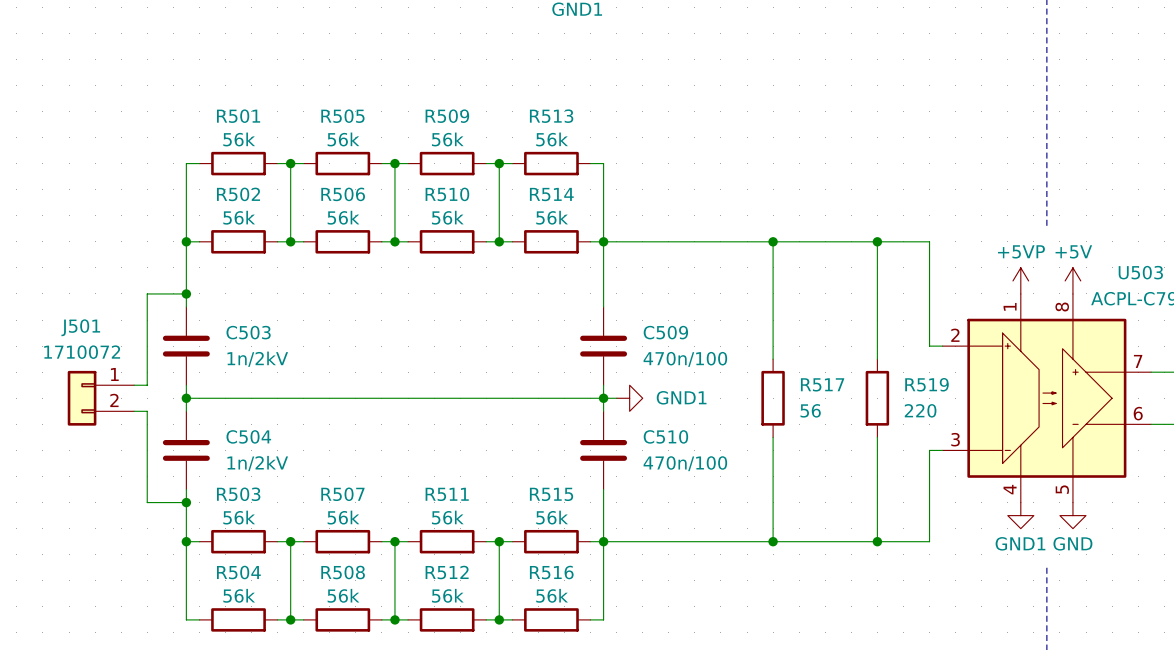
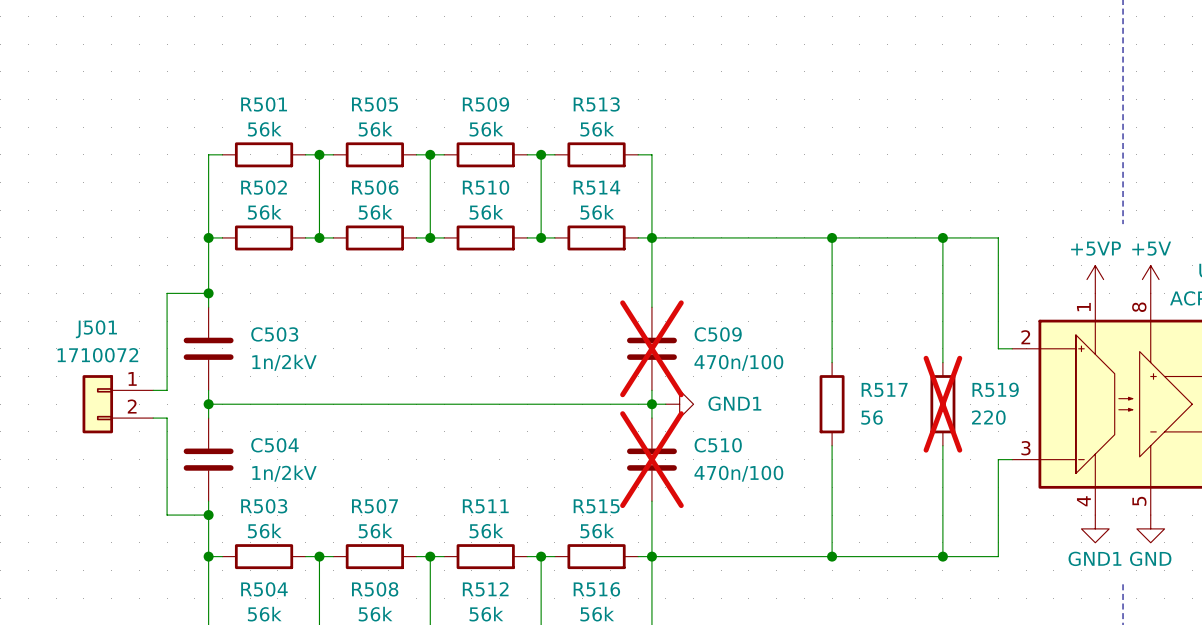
C509 do-not-place cross: none -> (651, 348)
R519 do-not-place cross: none -> (942, 404)
C510 do-not-place cross: none -> (651, 459)

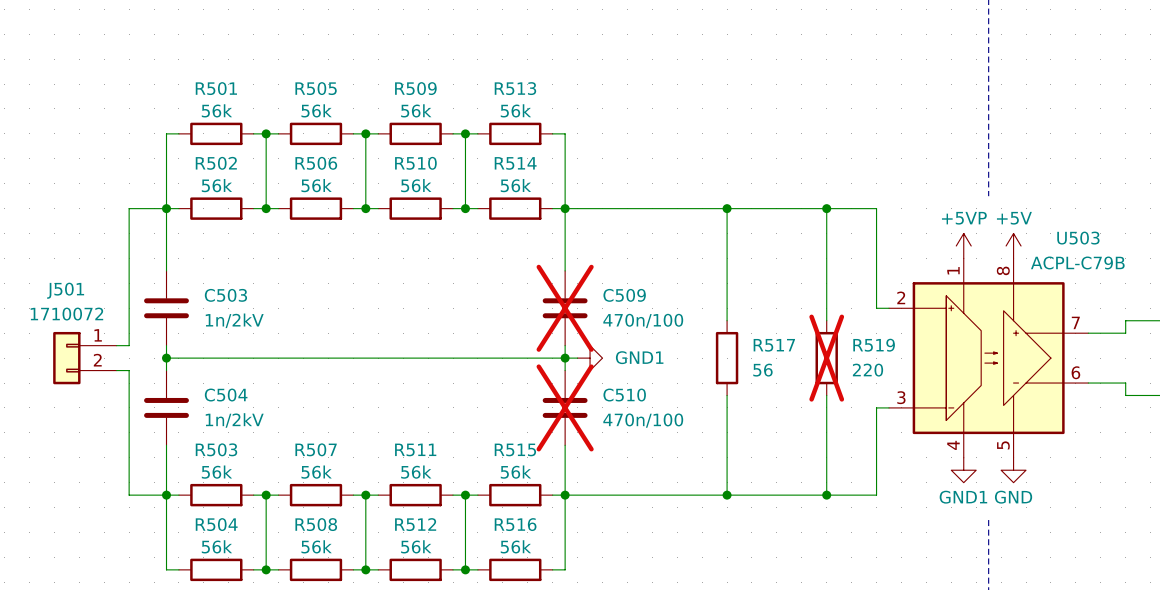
wire: (167, 293) (208, 293) -> (129, 258) (129, 208) (166, 208)
junction: (208, 293) -> none
wire: (167, 515) (208, 515) -> (129, 457) (129, 495) (166, 495)
junction: (208, 515) -> none

